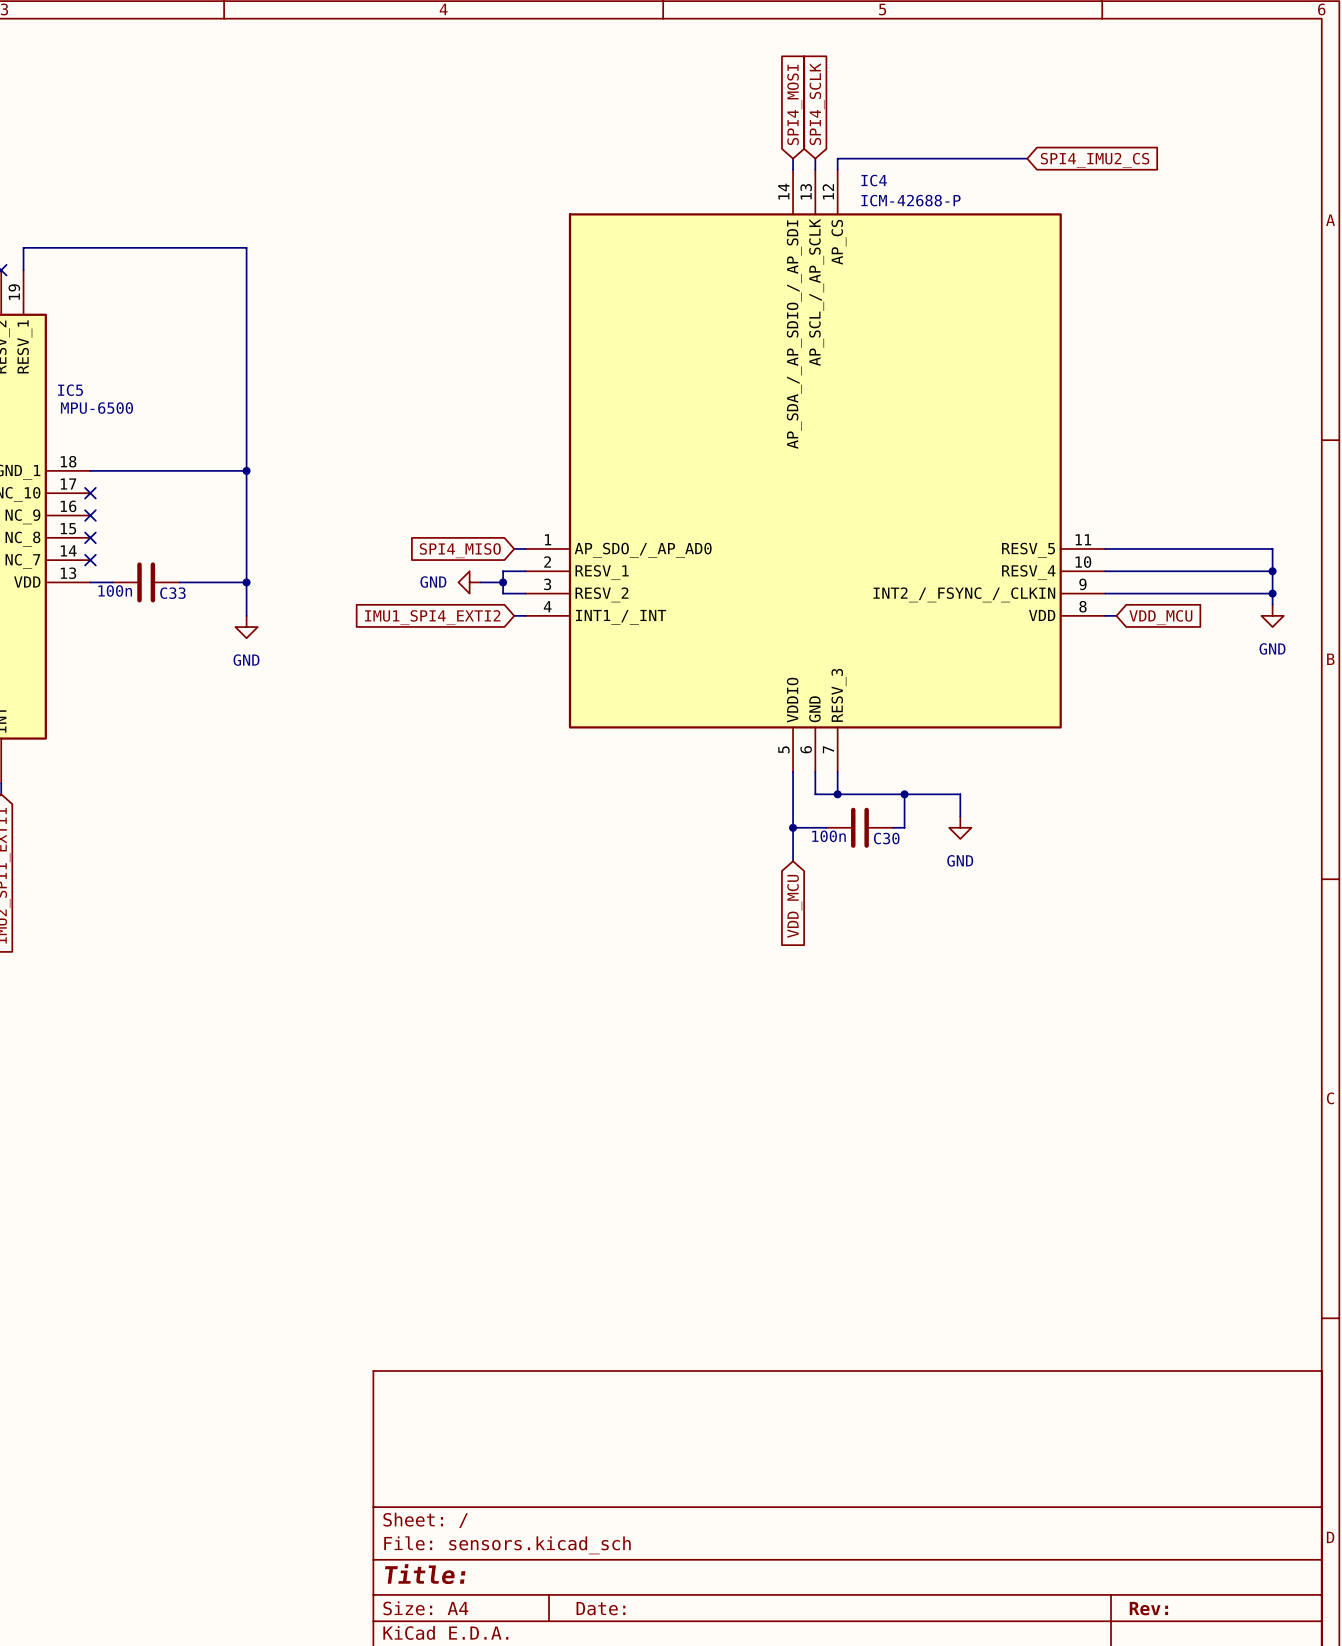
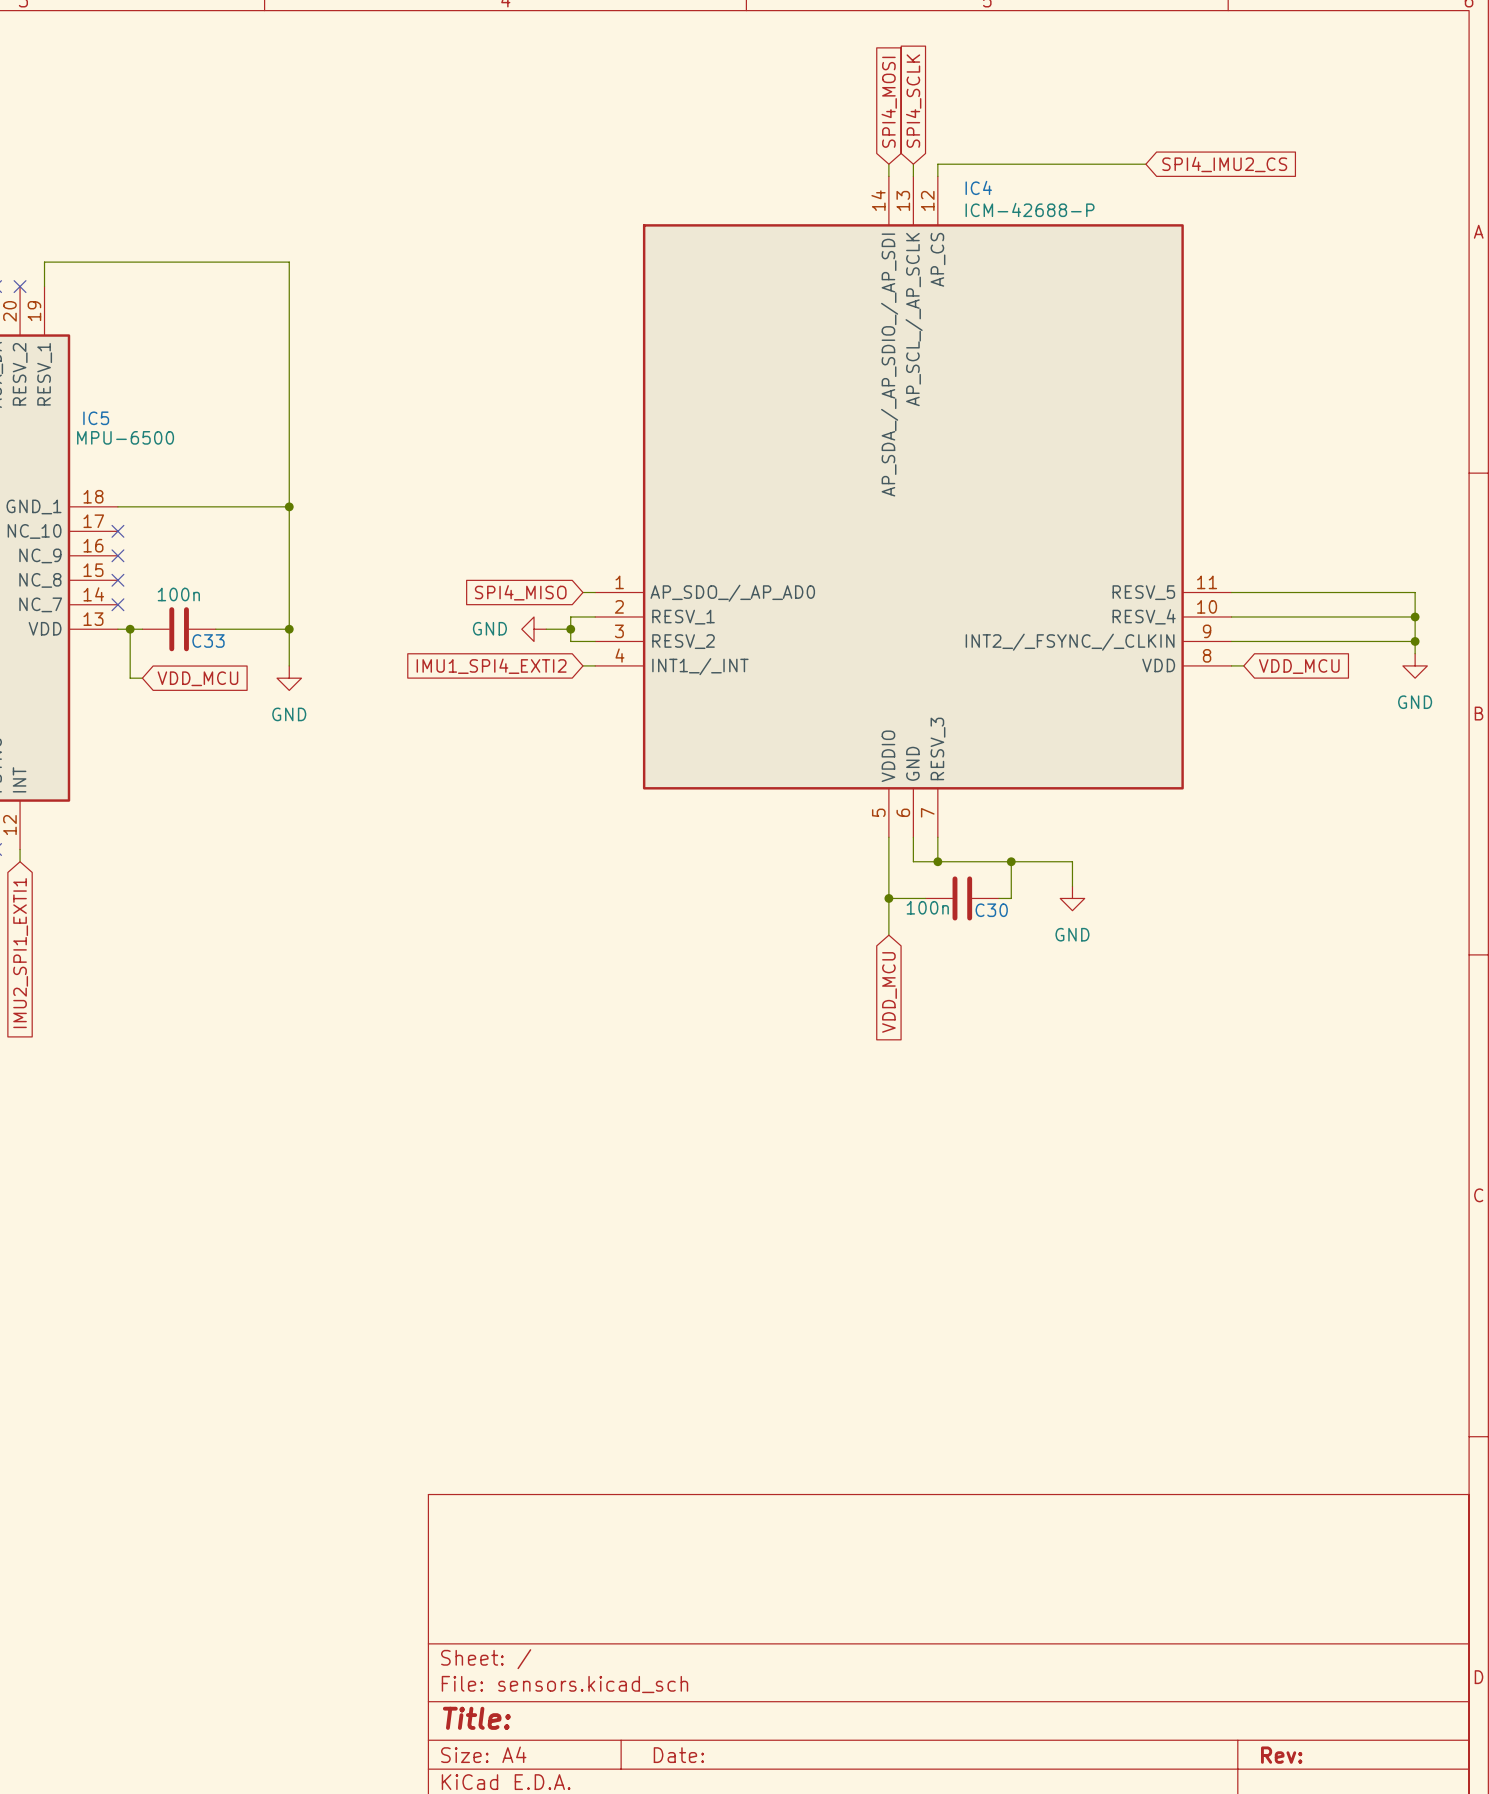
wire: none -> (130, 629) (130, 678) (142, 678)
junction: none -> (130, 629)
C33 value position: 100n (115, 590) -> 100n (178, 594)
global label: none -> VDD_MCU (197, 678)

